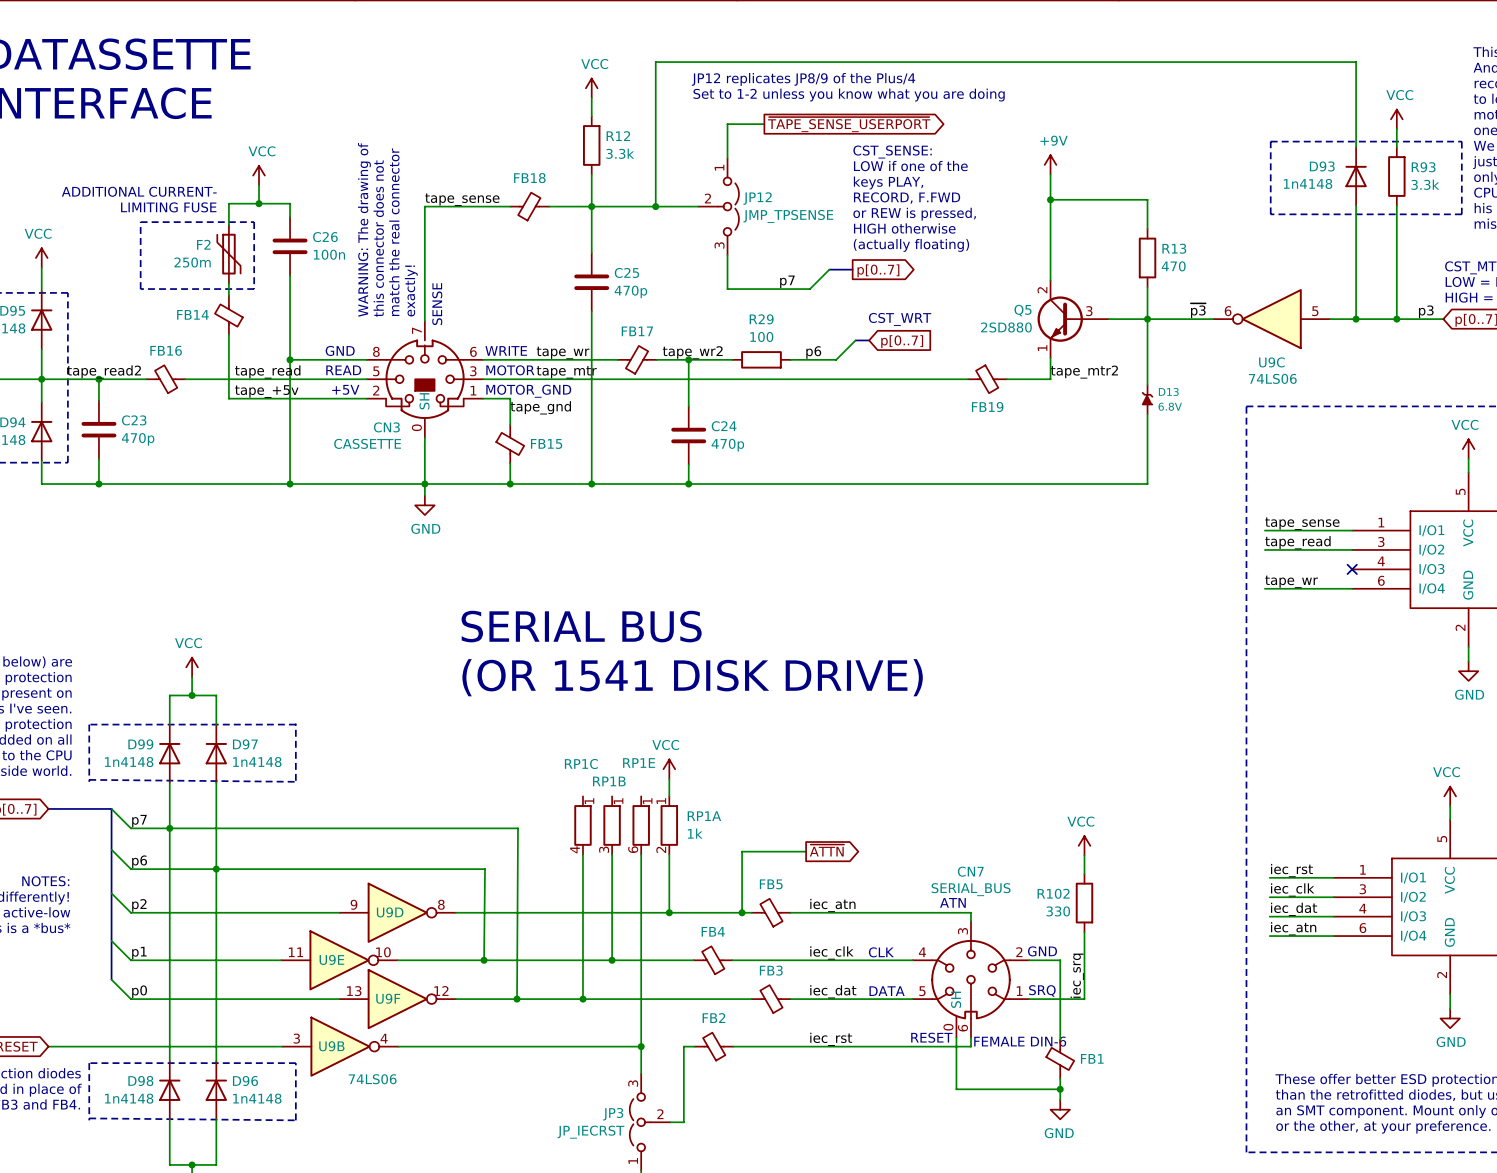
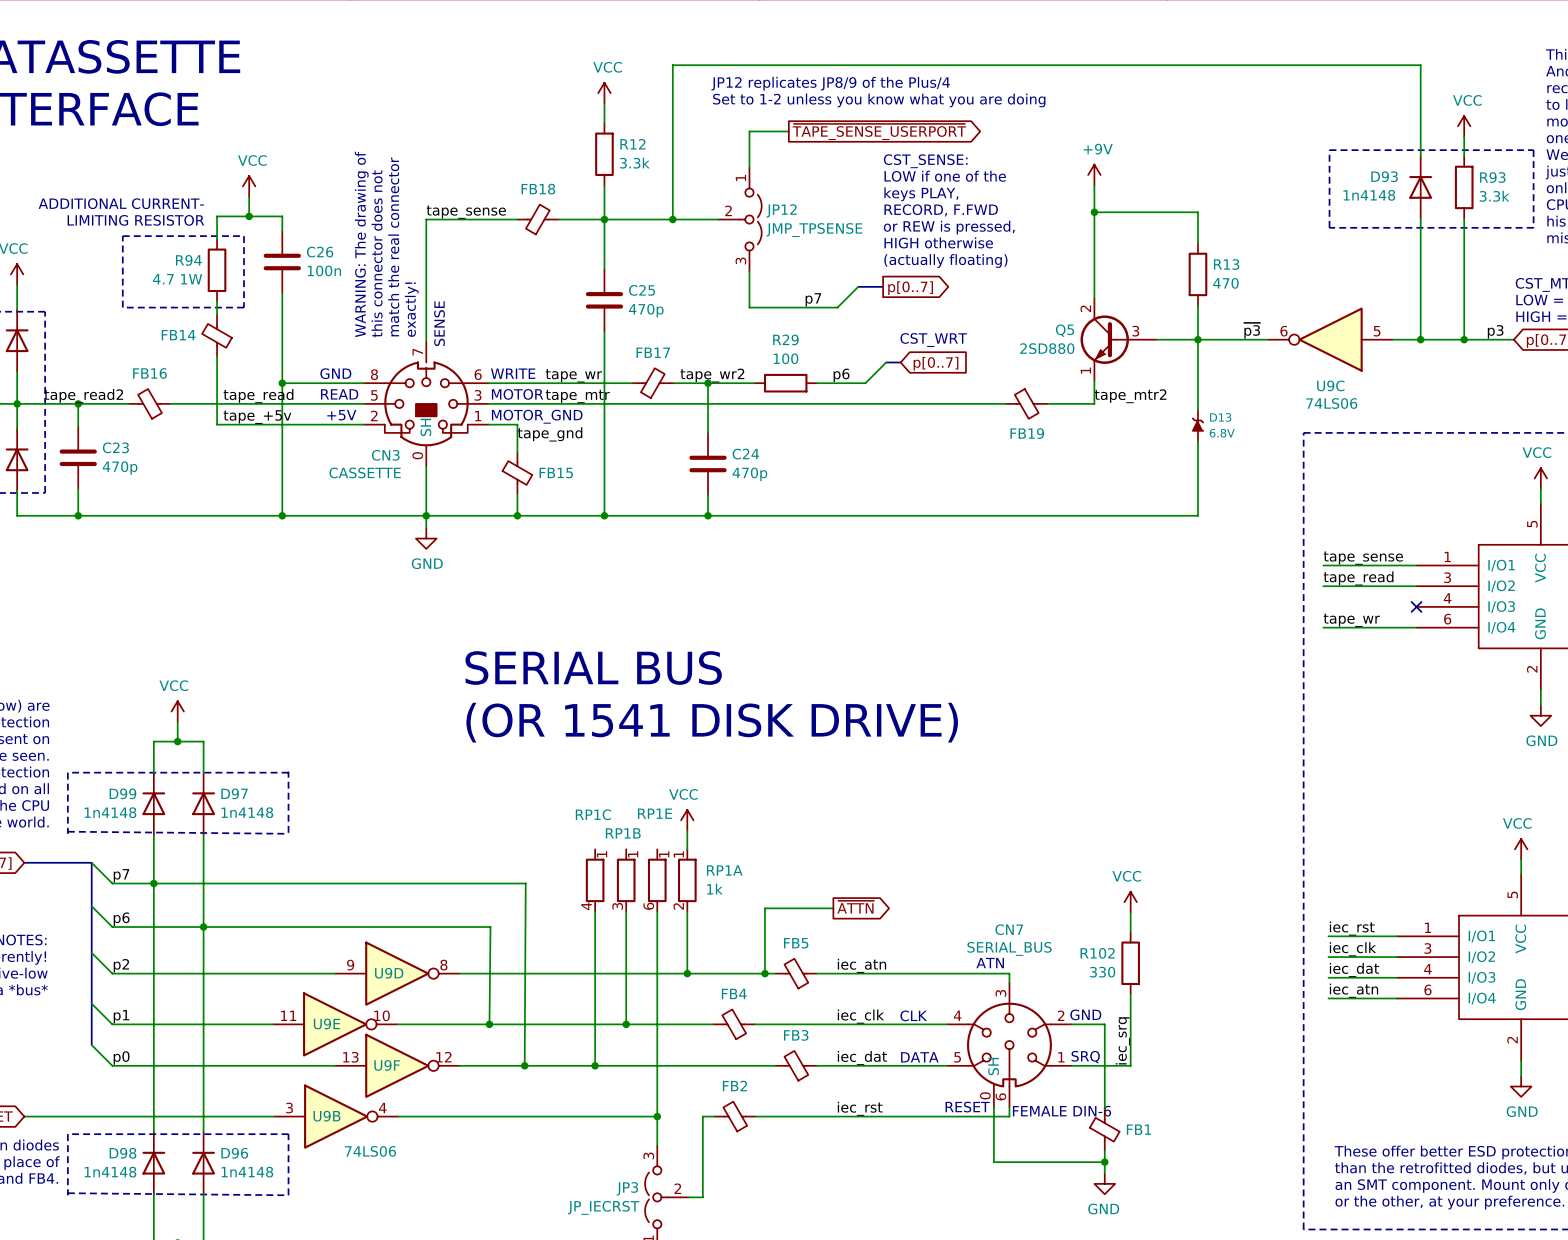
text: LIMITING FUSE (168, 207) -> LIMITING RESISTOR (135, 220)
F2: 250m (228, 254) -> none
R94: none -> 4.7 1W (217, 270)

